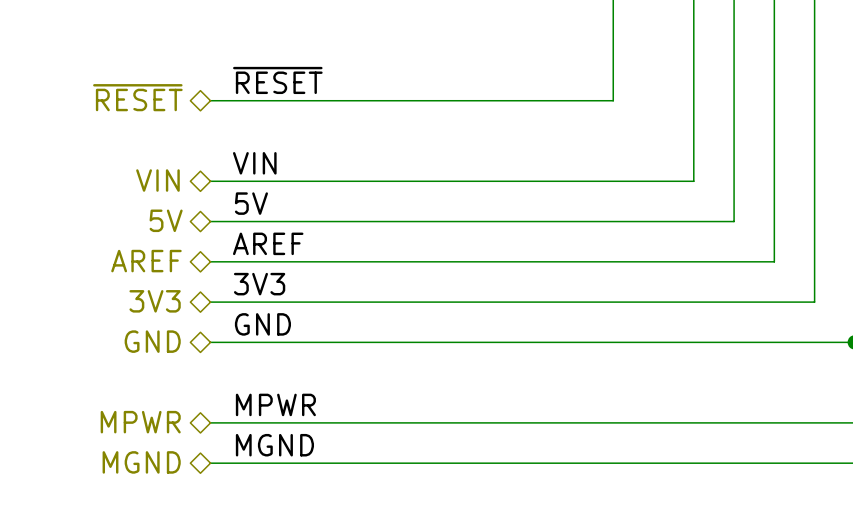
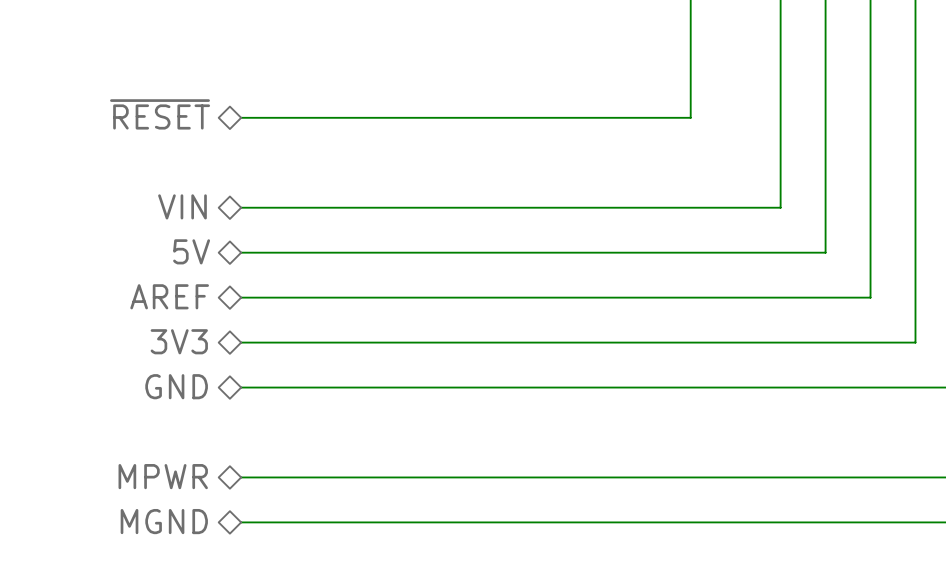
label: ~{RESET} (277, 80) -> none
label: VIN (254, 163) -> none
label: 5V (251, 203) -> none
label: AREF (268, 243) -> none
label: 3V3 (259, 284) -> none
label: GND (262, 324) -> none
label: MPWR (275, 404) -> none
label: MGND (274, 445) -> none

